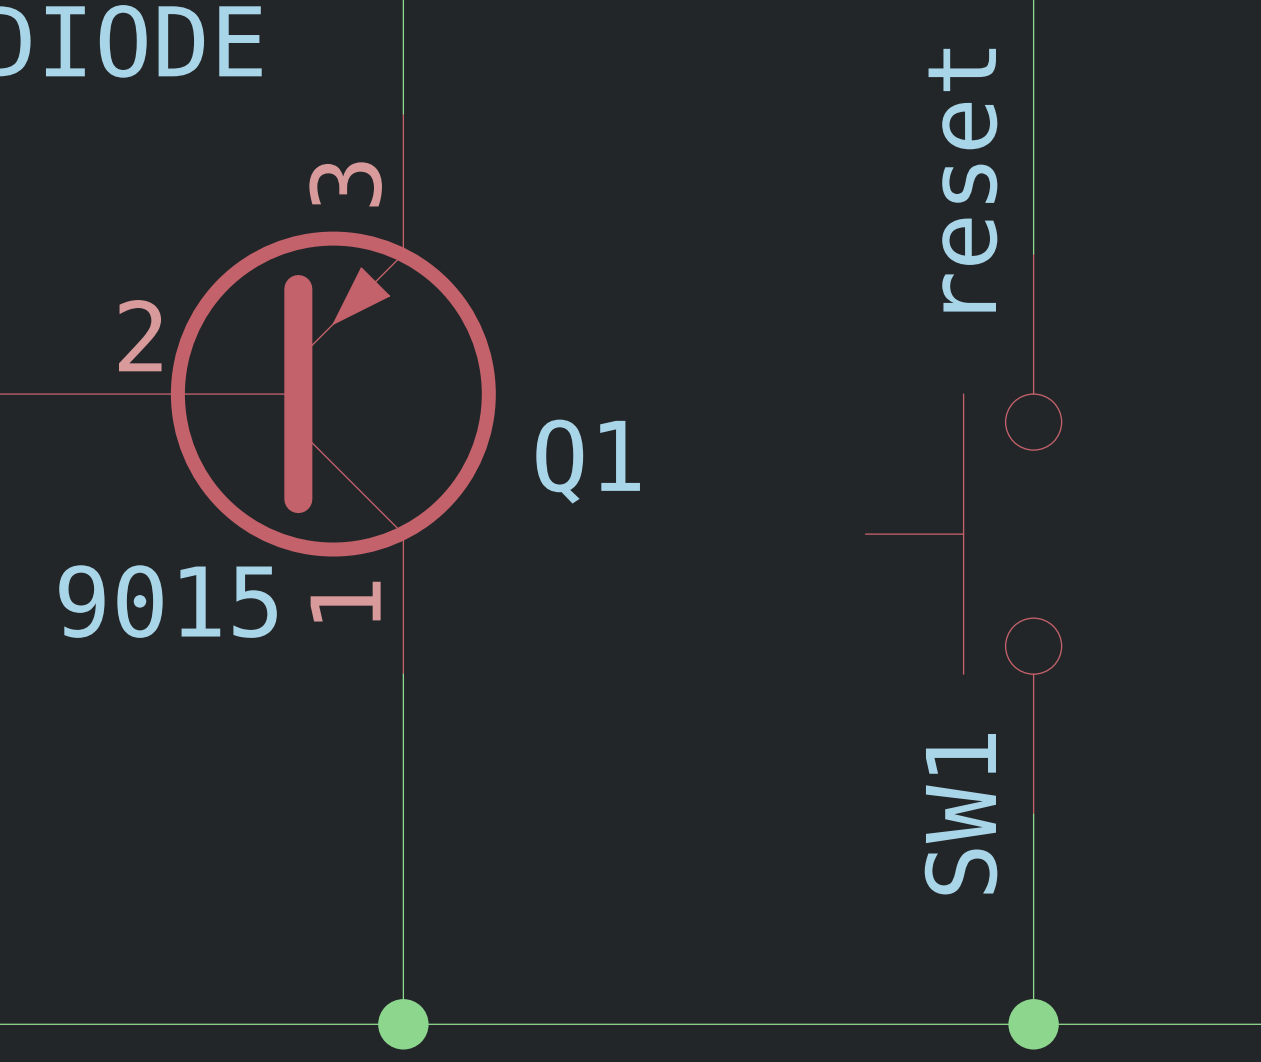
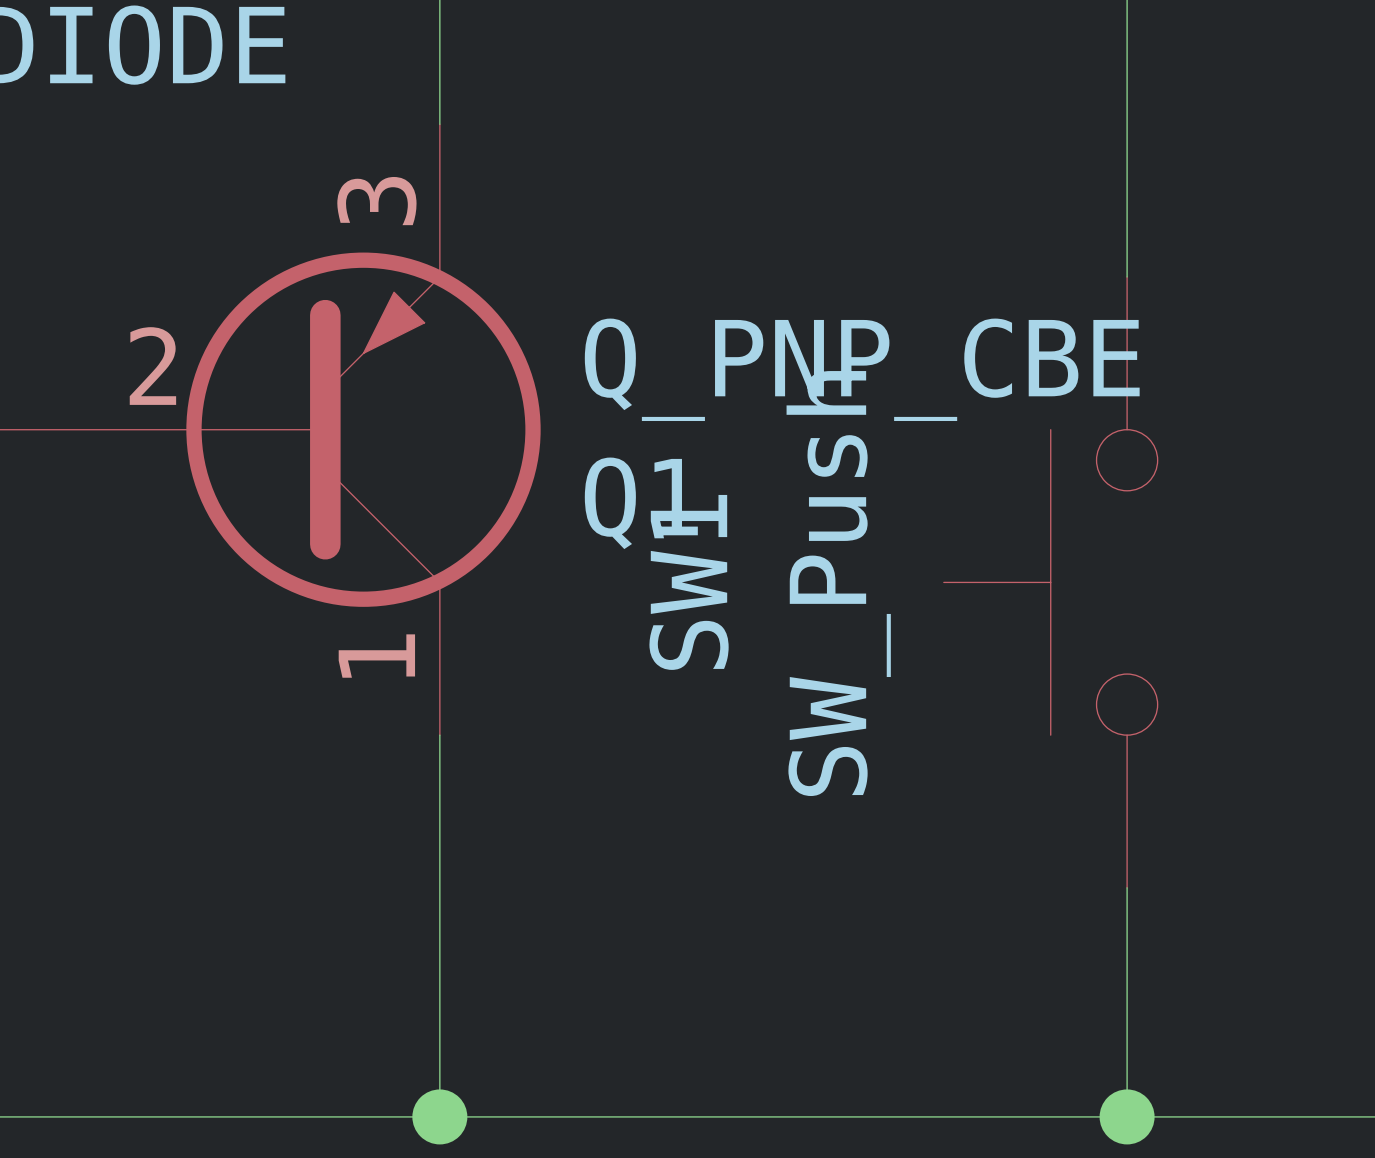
SW1 value: reset (962, 180) -> SW_Push (838, 583)
Q1 value: 9015 (168, 601) -> Q_PNP_CBE (862, 369)
SW1 name position: SW1 (961, 814) -> SW1 (689, 582)

